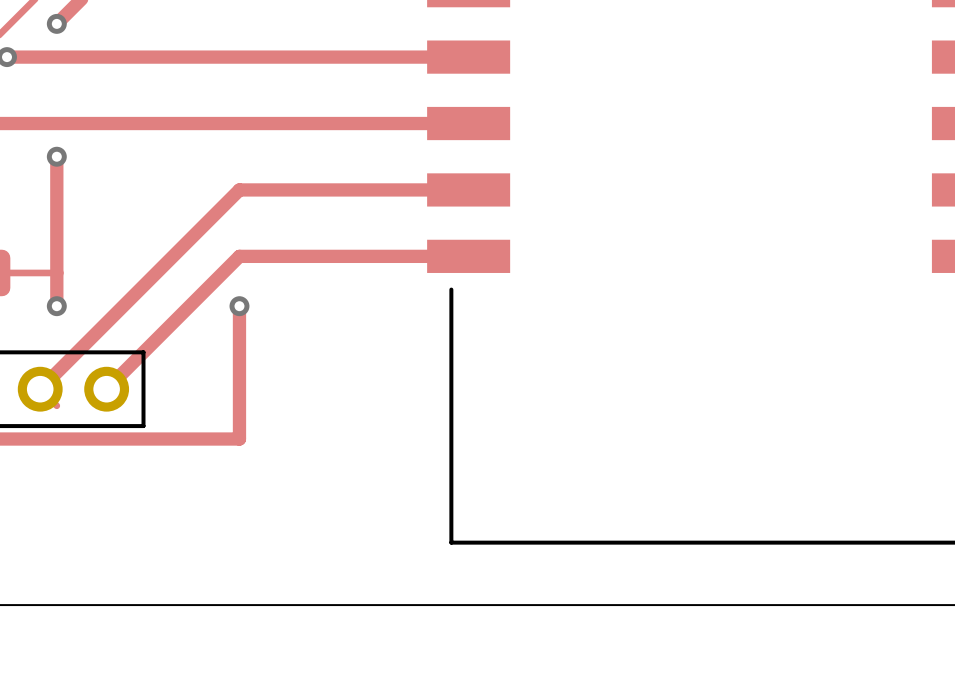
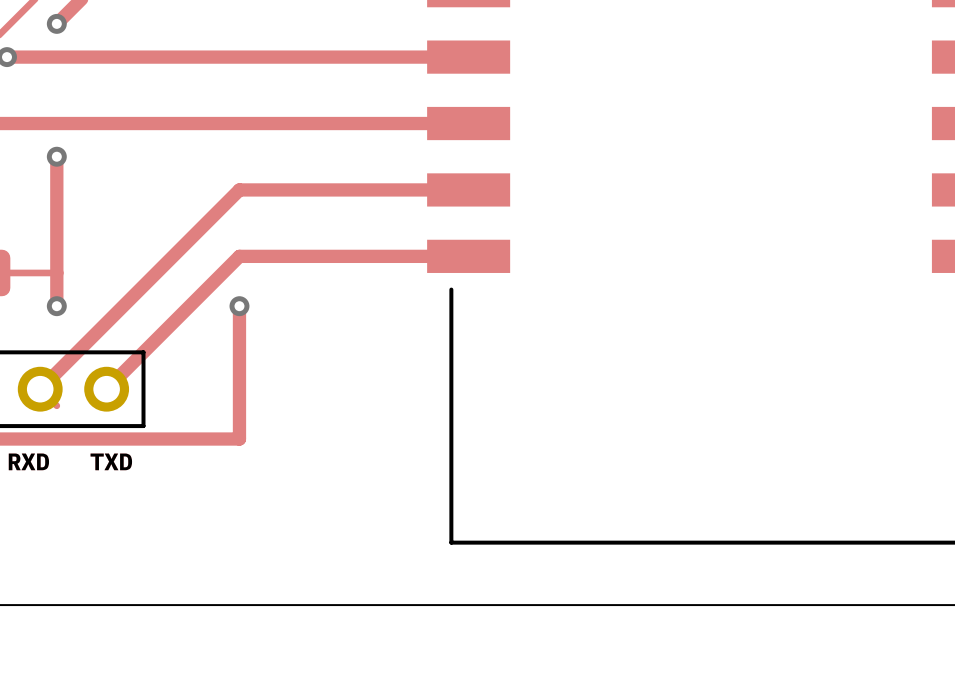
text: none -> RXD (28, 461)
text: none -> TXD (111, 461)

